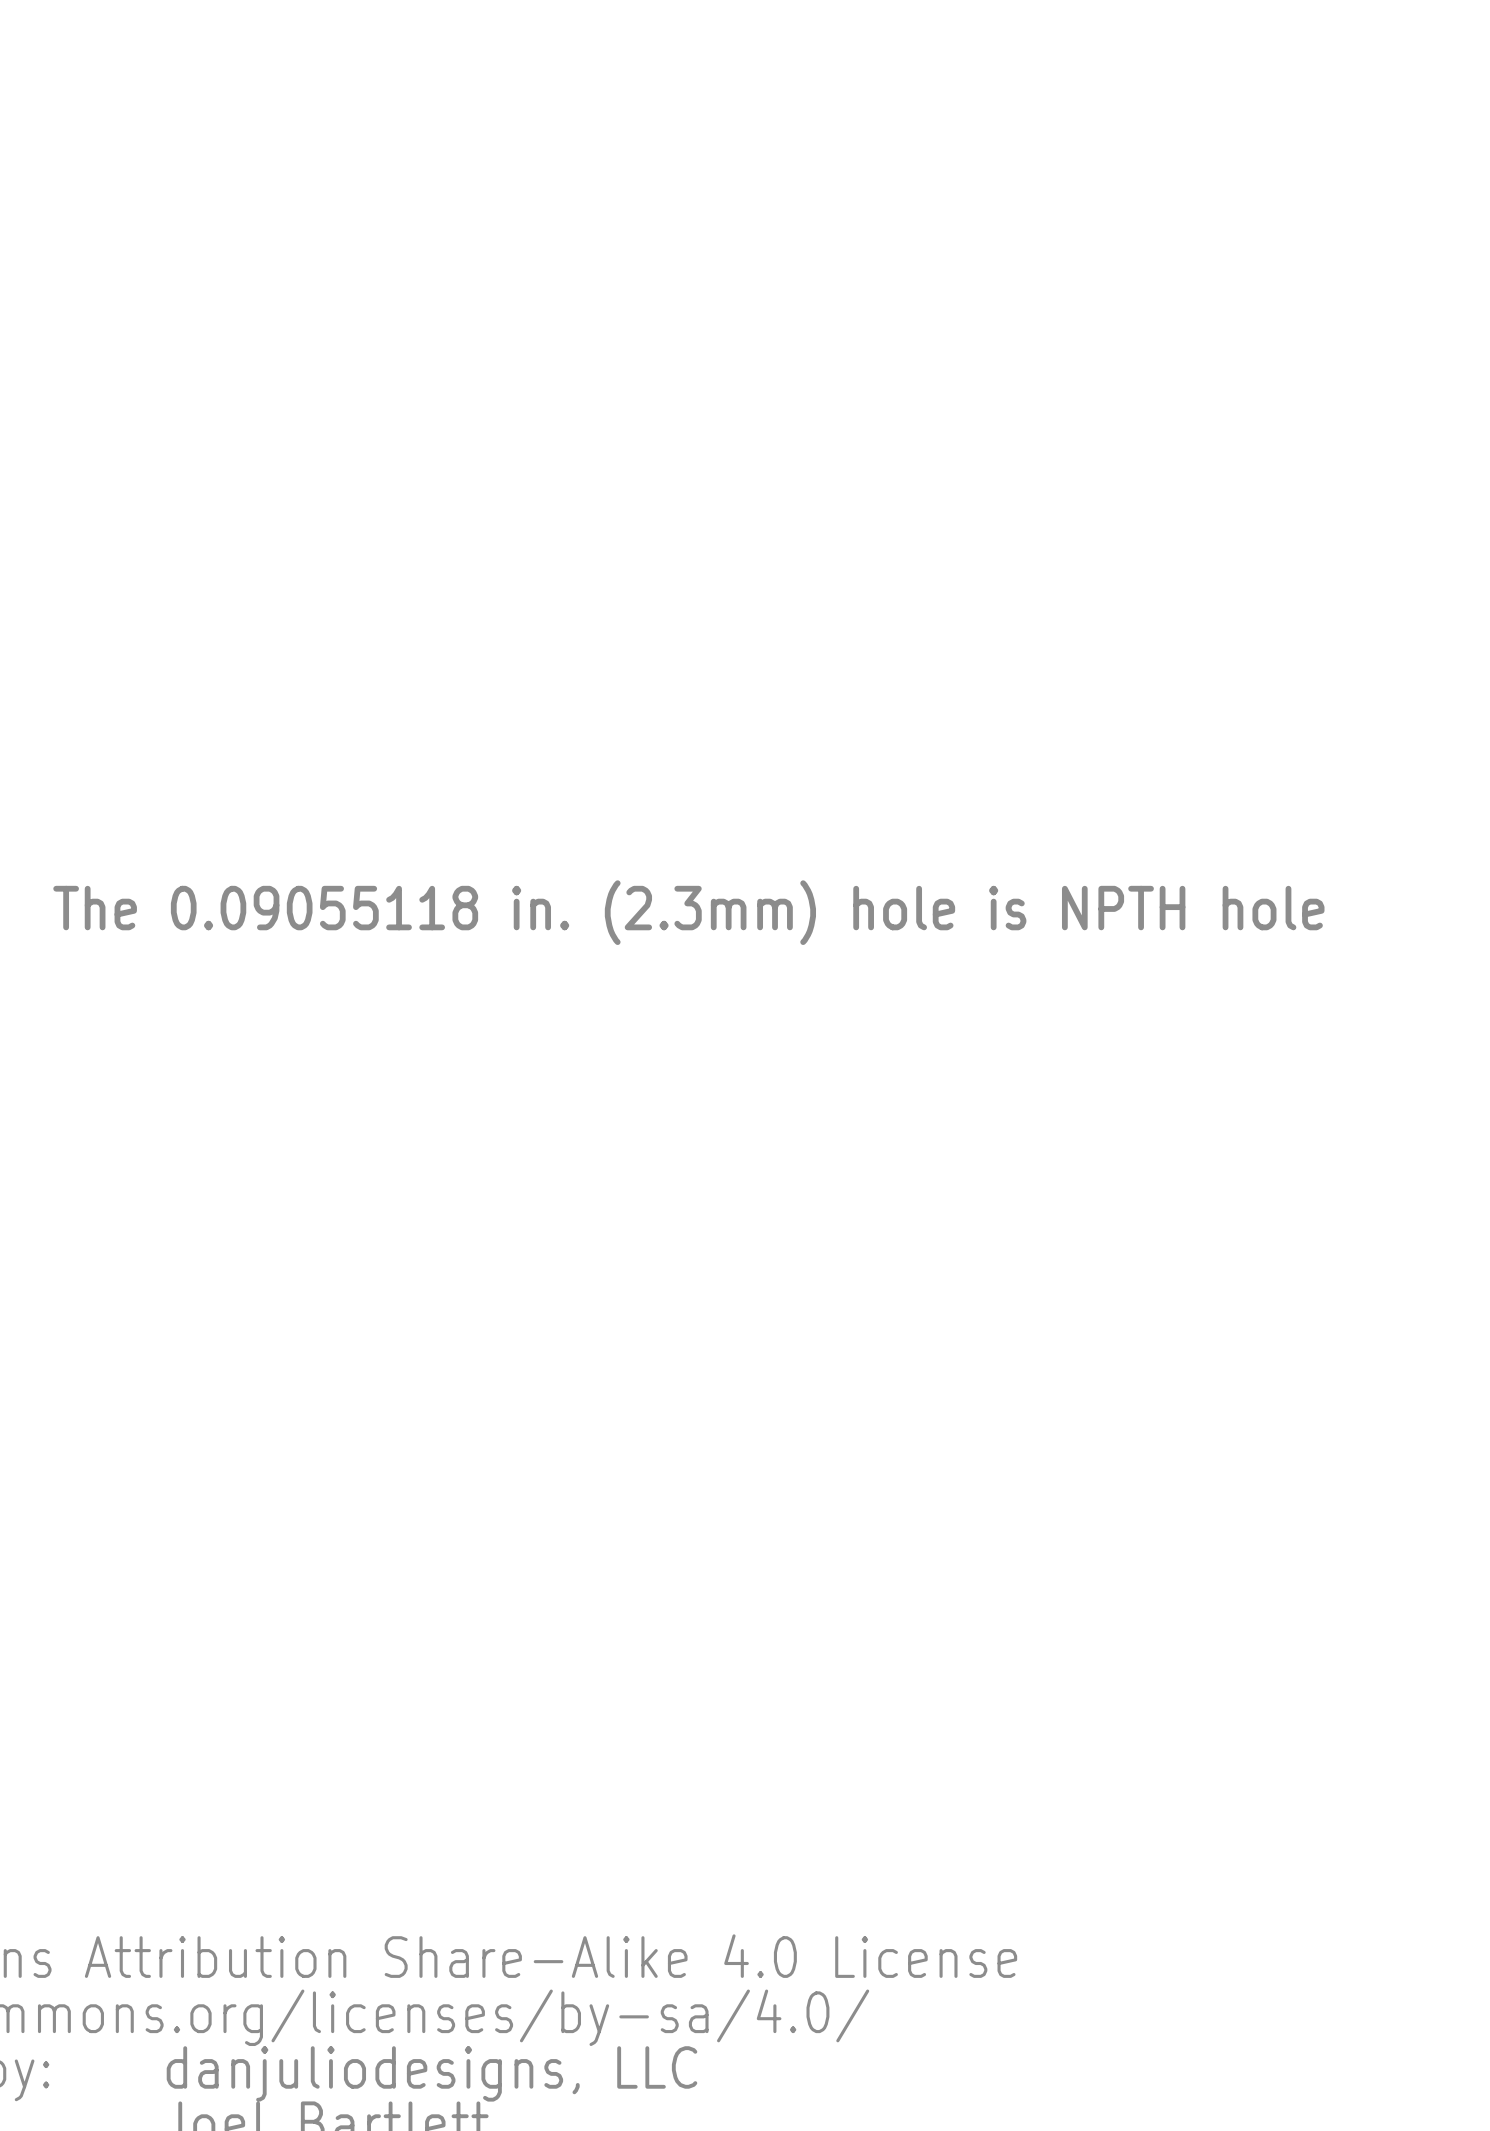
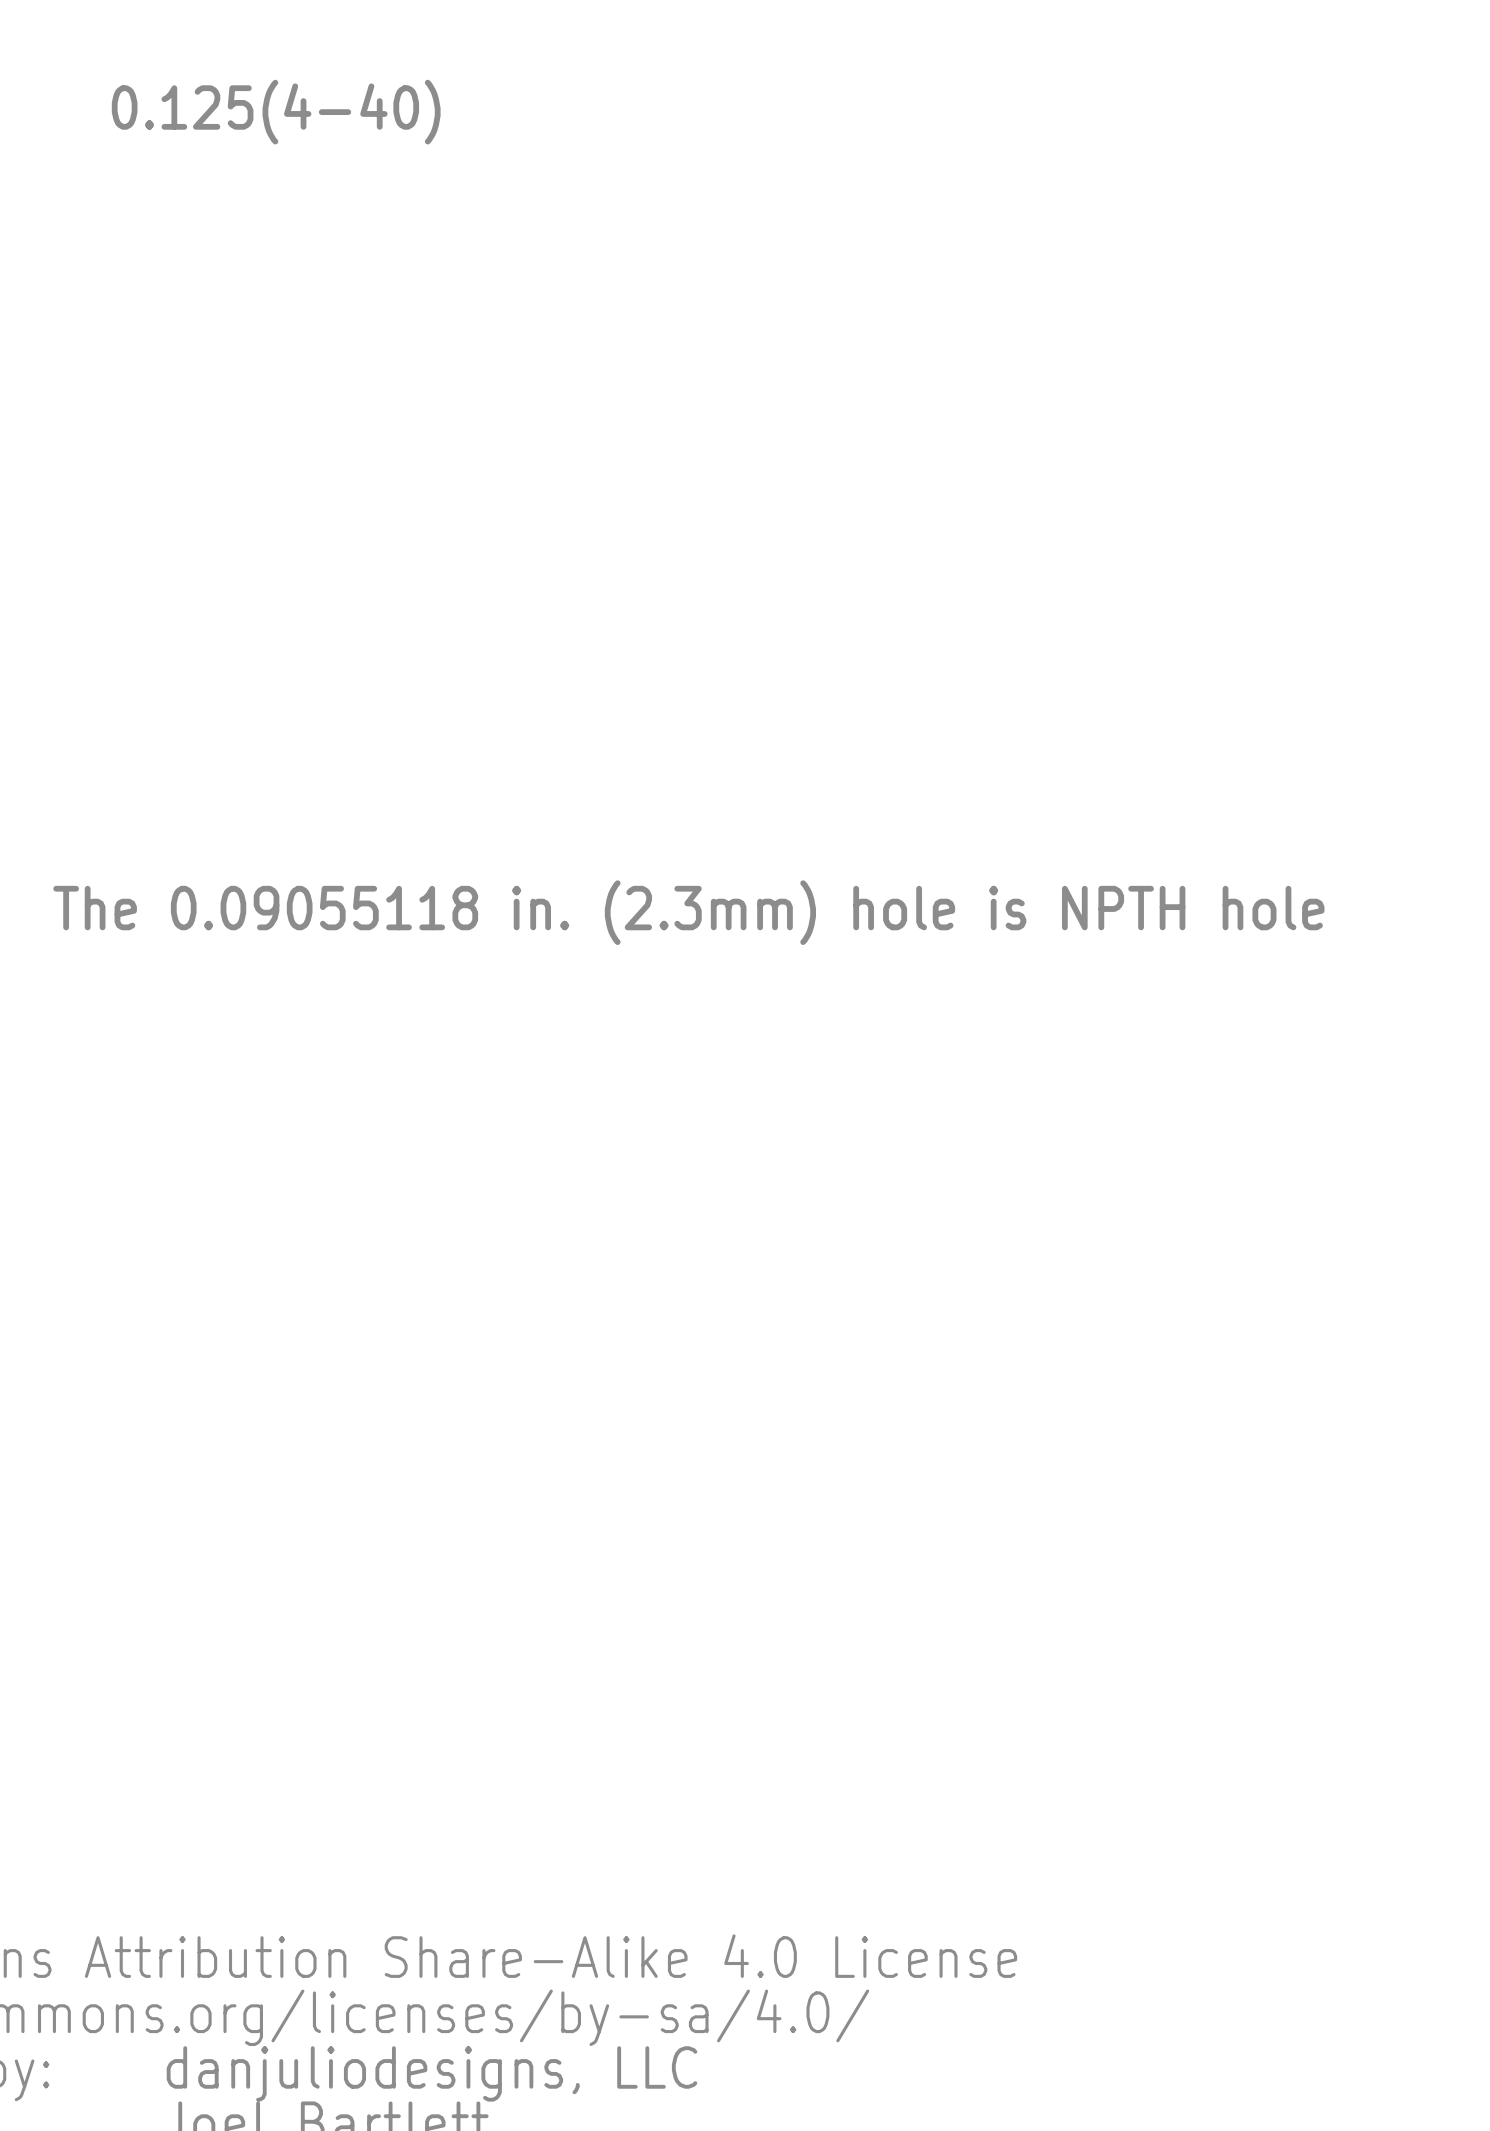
text: none -> 0.125(4-40) (276, 112)

